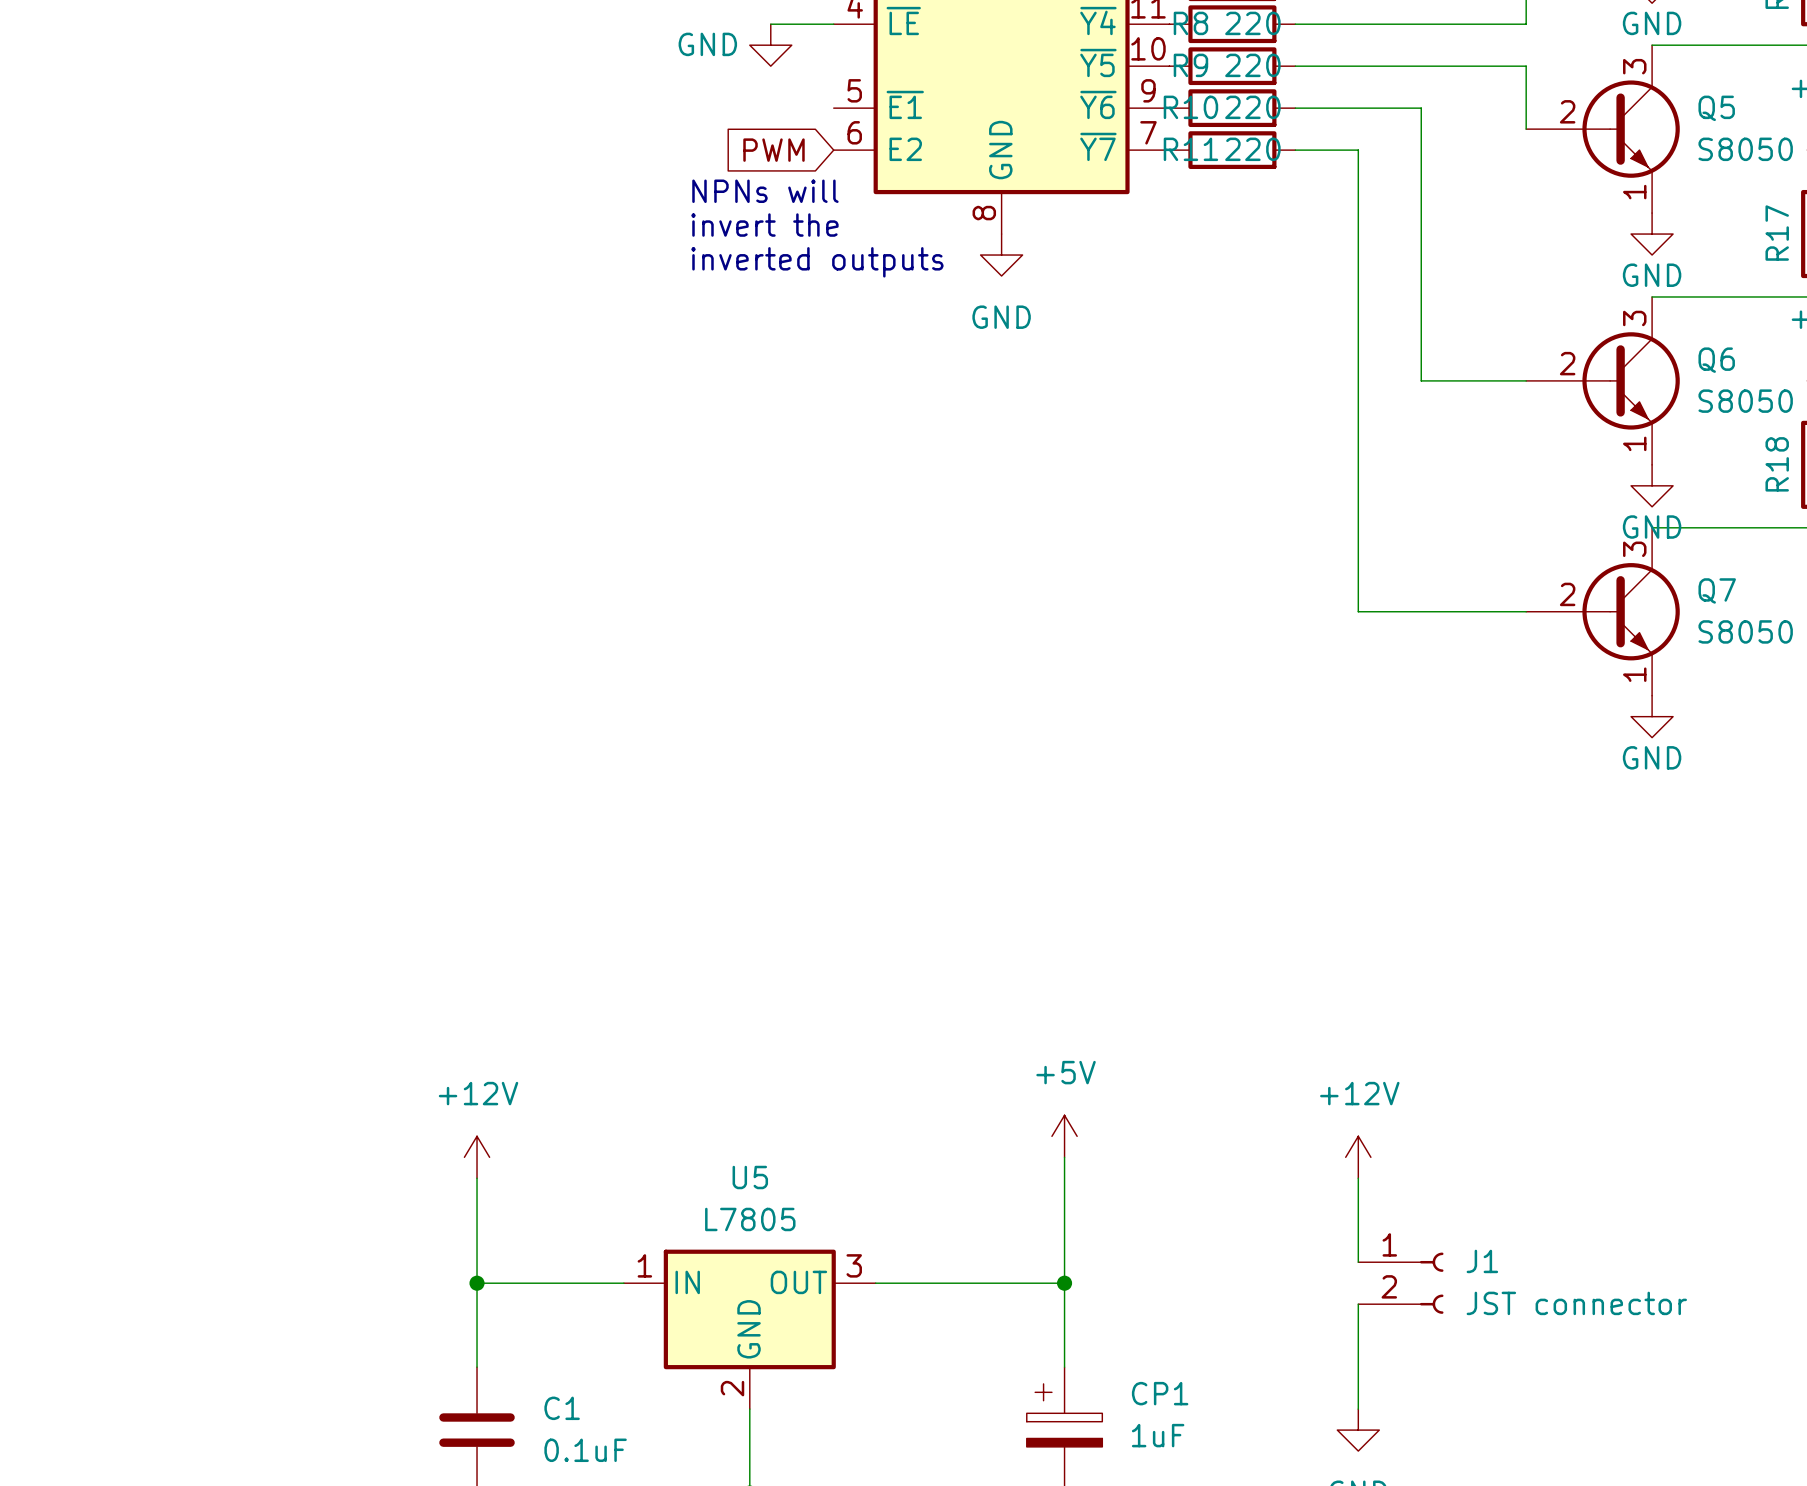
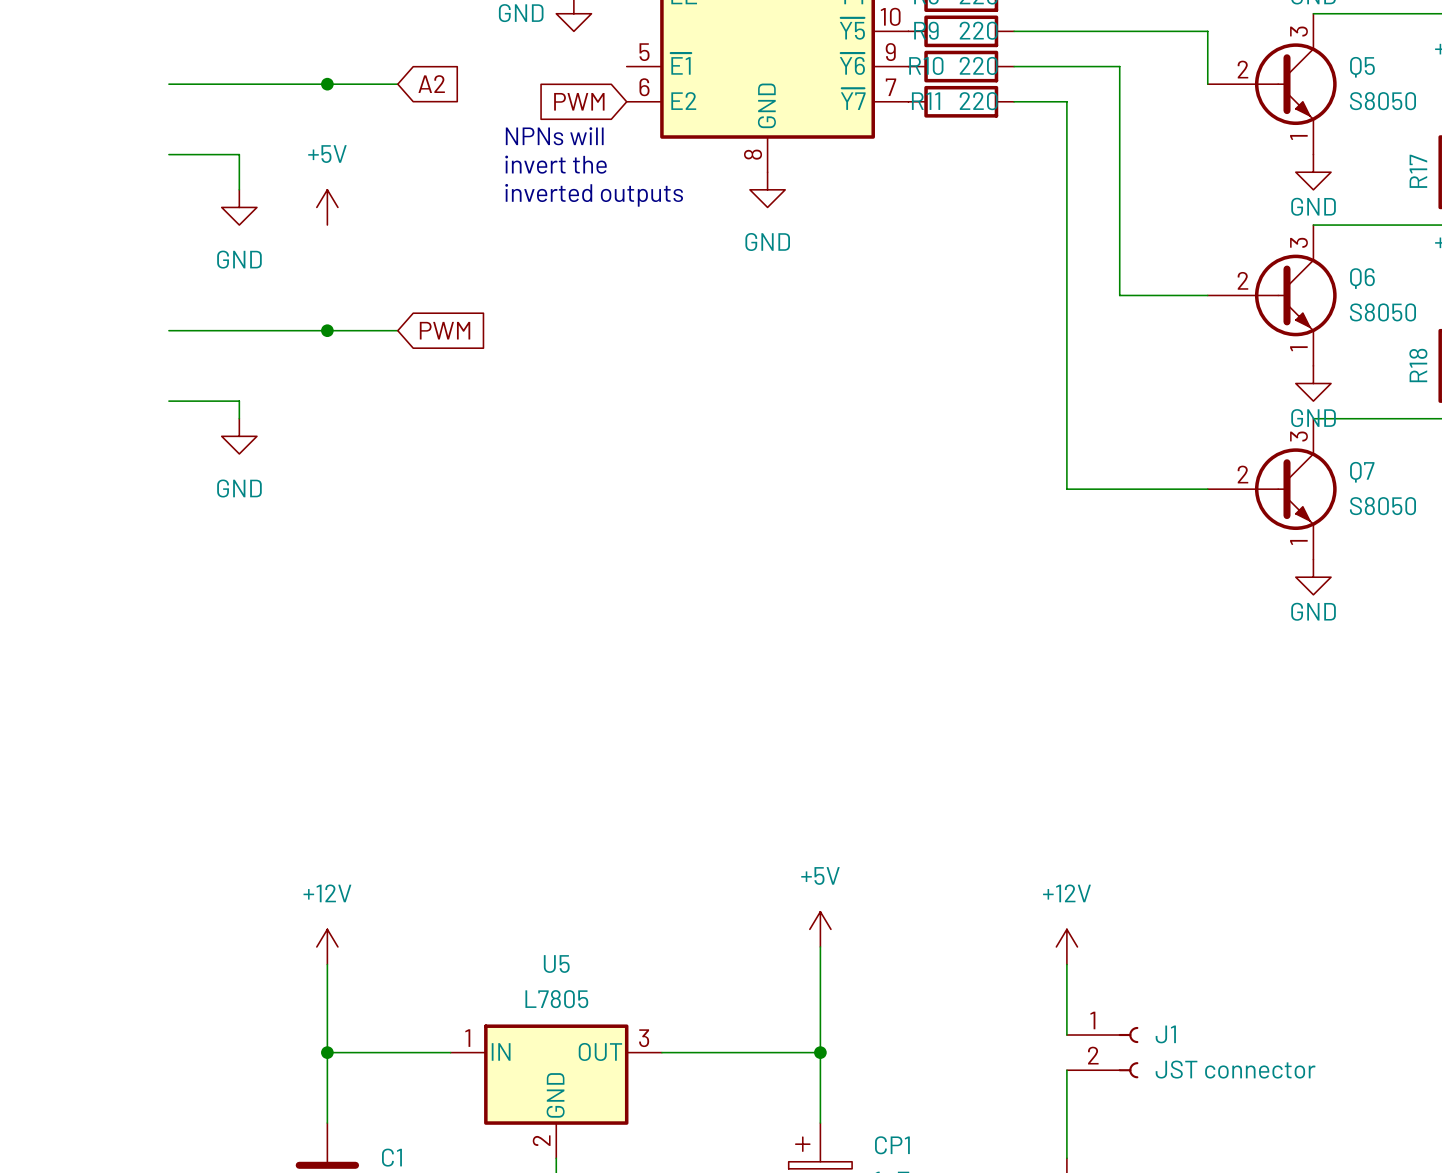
wire: none -> (168, 84) (397, 84)
junction: none -> (327, 84)
global label: none -> A2 (431, 84)
wire: none -> (168, 154) (239, 154) (239, 189)
power symbol: none -> GND (239, 207)
power symbol: none -> +5V (327, 207)
wire: none -> (168, 330) (397, 330)
junction: none -> (327, 330)
global label: none -> PWM (445, 330)
wire: none -> (168, 401) (239, 401) (239, 418)
power symbol: none -> GND (239, 436)

